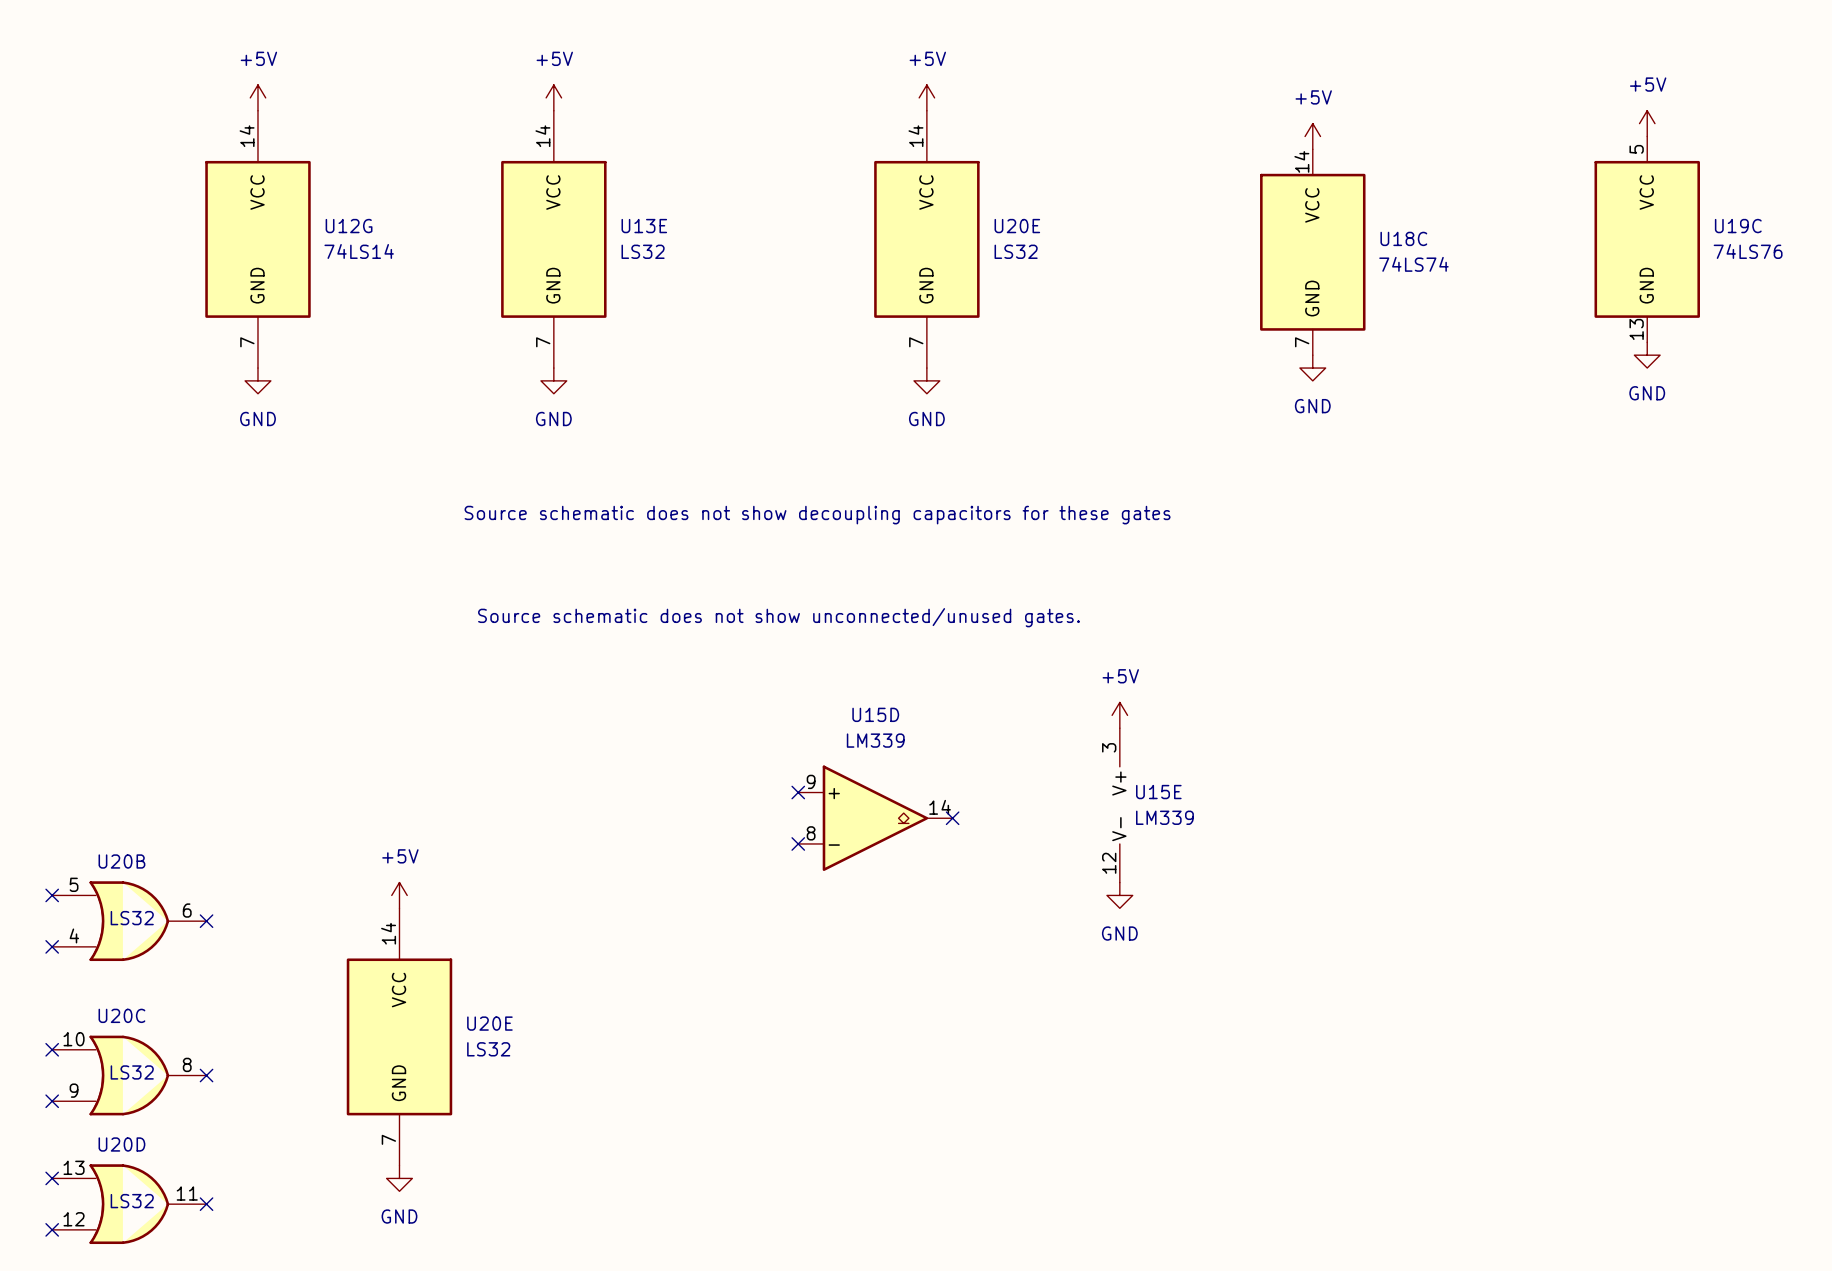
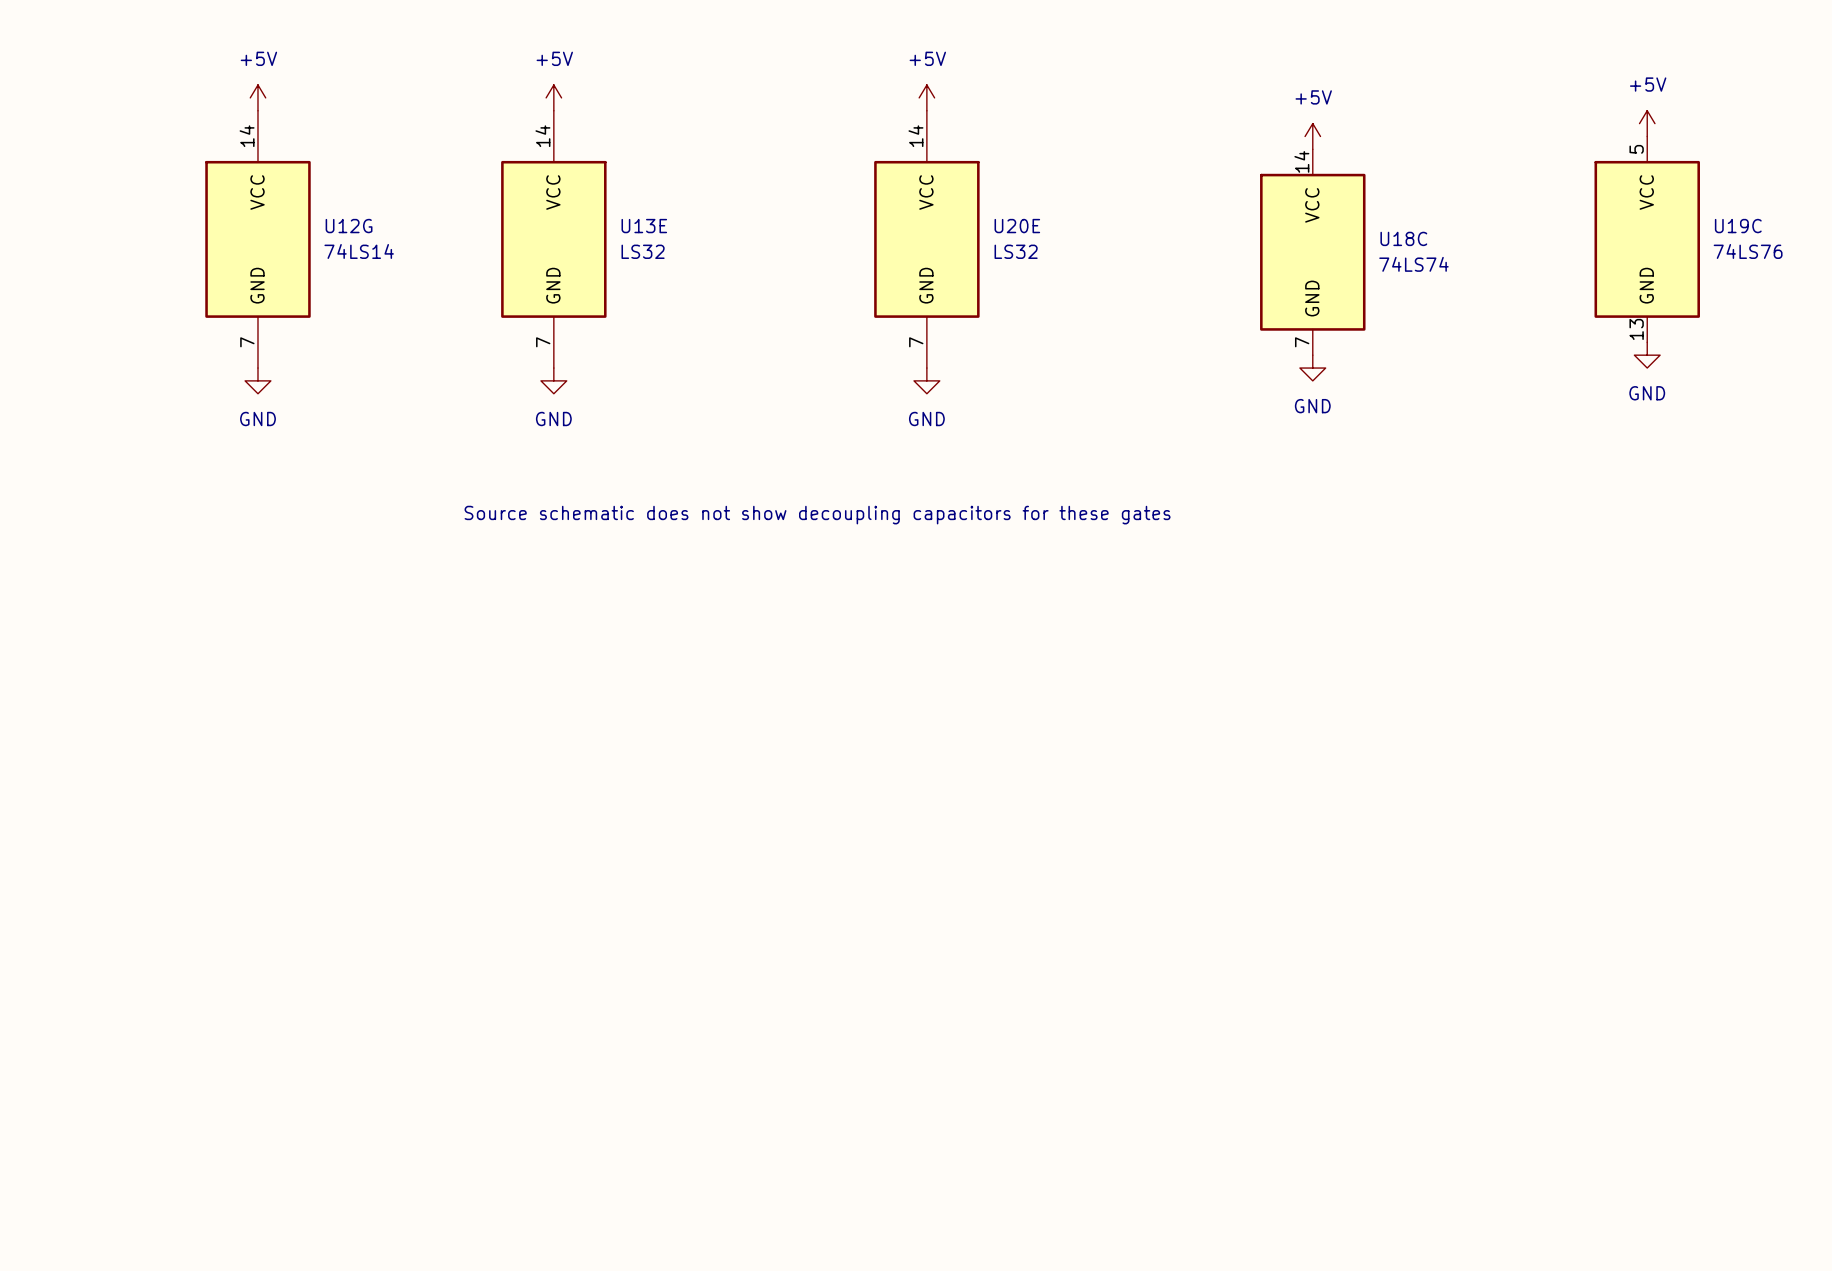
text: Source schematic does not show unconnected/unused gates. (778, 617) -> none
power symbol: +5V (1119, 715) -> none
no-connect mark: (798, 792) -> none
U15E: LM339 (1119, 805) -> none
U15D: LM339 (875, 818) -> none
no-connect mark: (952, 818) -> none
no-connect mark: (798, 843) -> none
no-connect mark: (52, 895) -> none
power symbol: +5V (399, 895) -> none
power symbol: GND (1119, 895) -> none
U20B: LS32 (129, 921) -> none
no-connect mark: (206, 921) -> none
no-connect mark: (52, 946) -> none
U20E: LS32 (399, 1036) -> none
no-connect mark: (52, 1049) -> none
U20C: LS32 (129, 1075) -> none
no-connect mark: (206, 1075) -> none
no-connect mark: (52, 1101) -> none
no-connect mark: (52, 1178) -> none
power symbol: GND (399, 1178) -> none
U20D: LS32 (129, 1204) -> none
no-connect mark: (206, 1204) -> none
no-connect mark: (52, 1229) -> none

